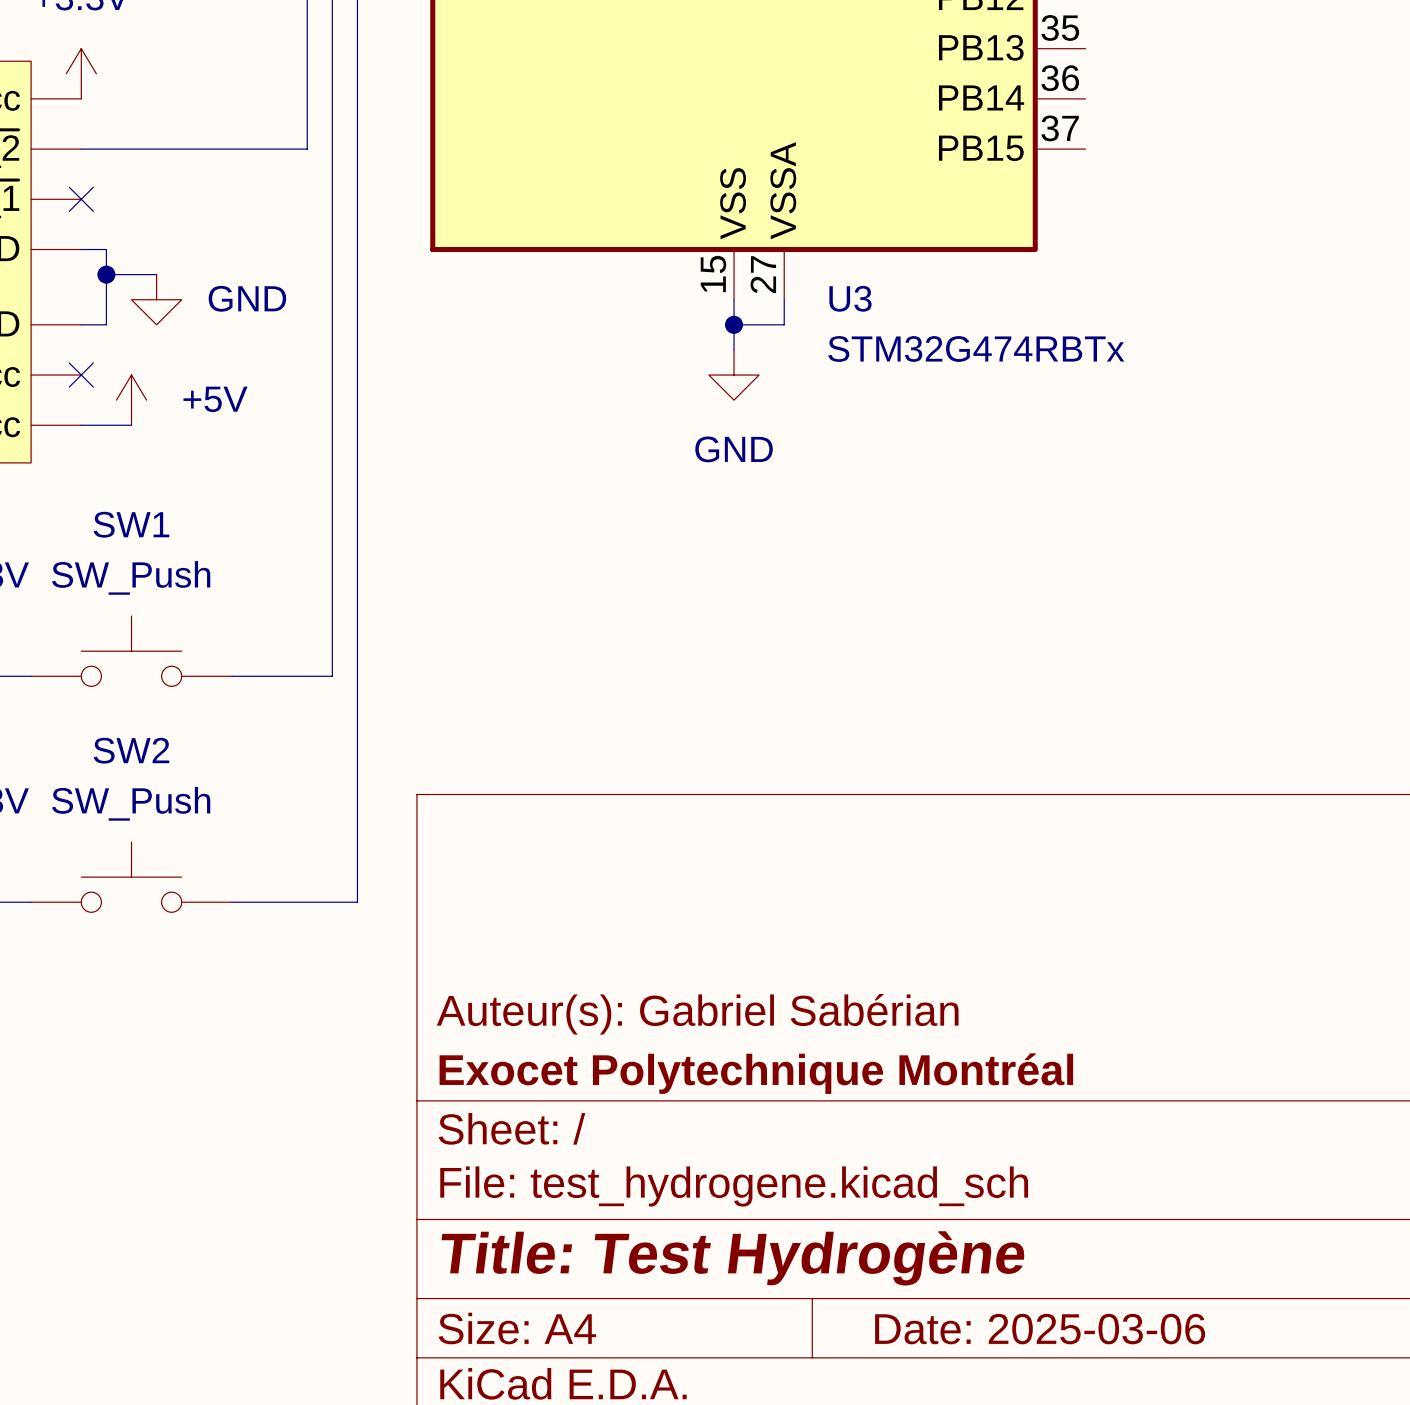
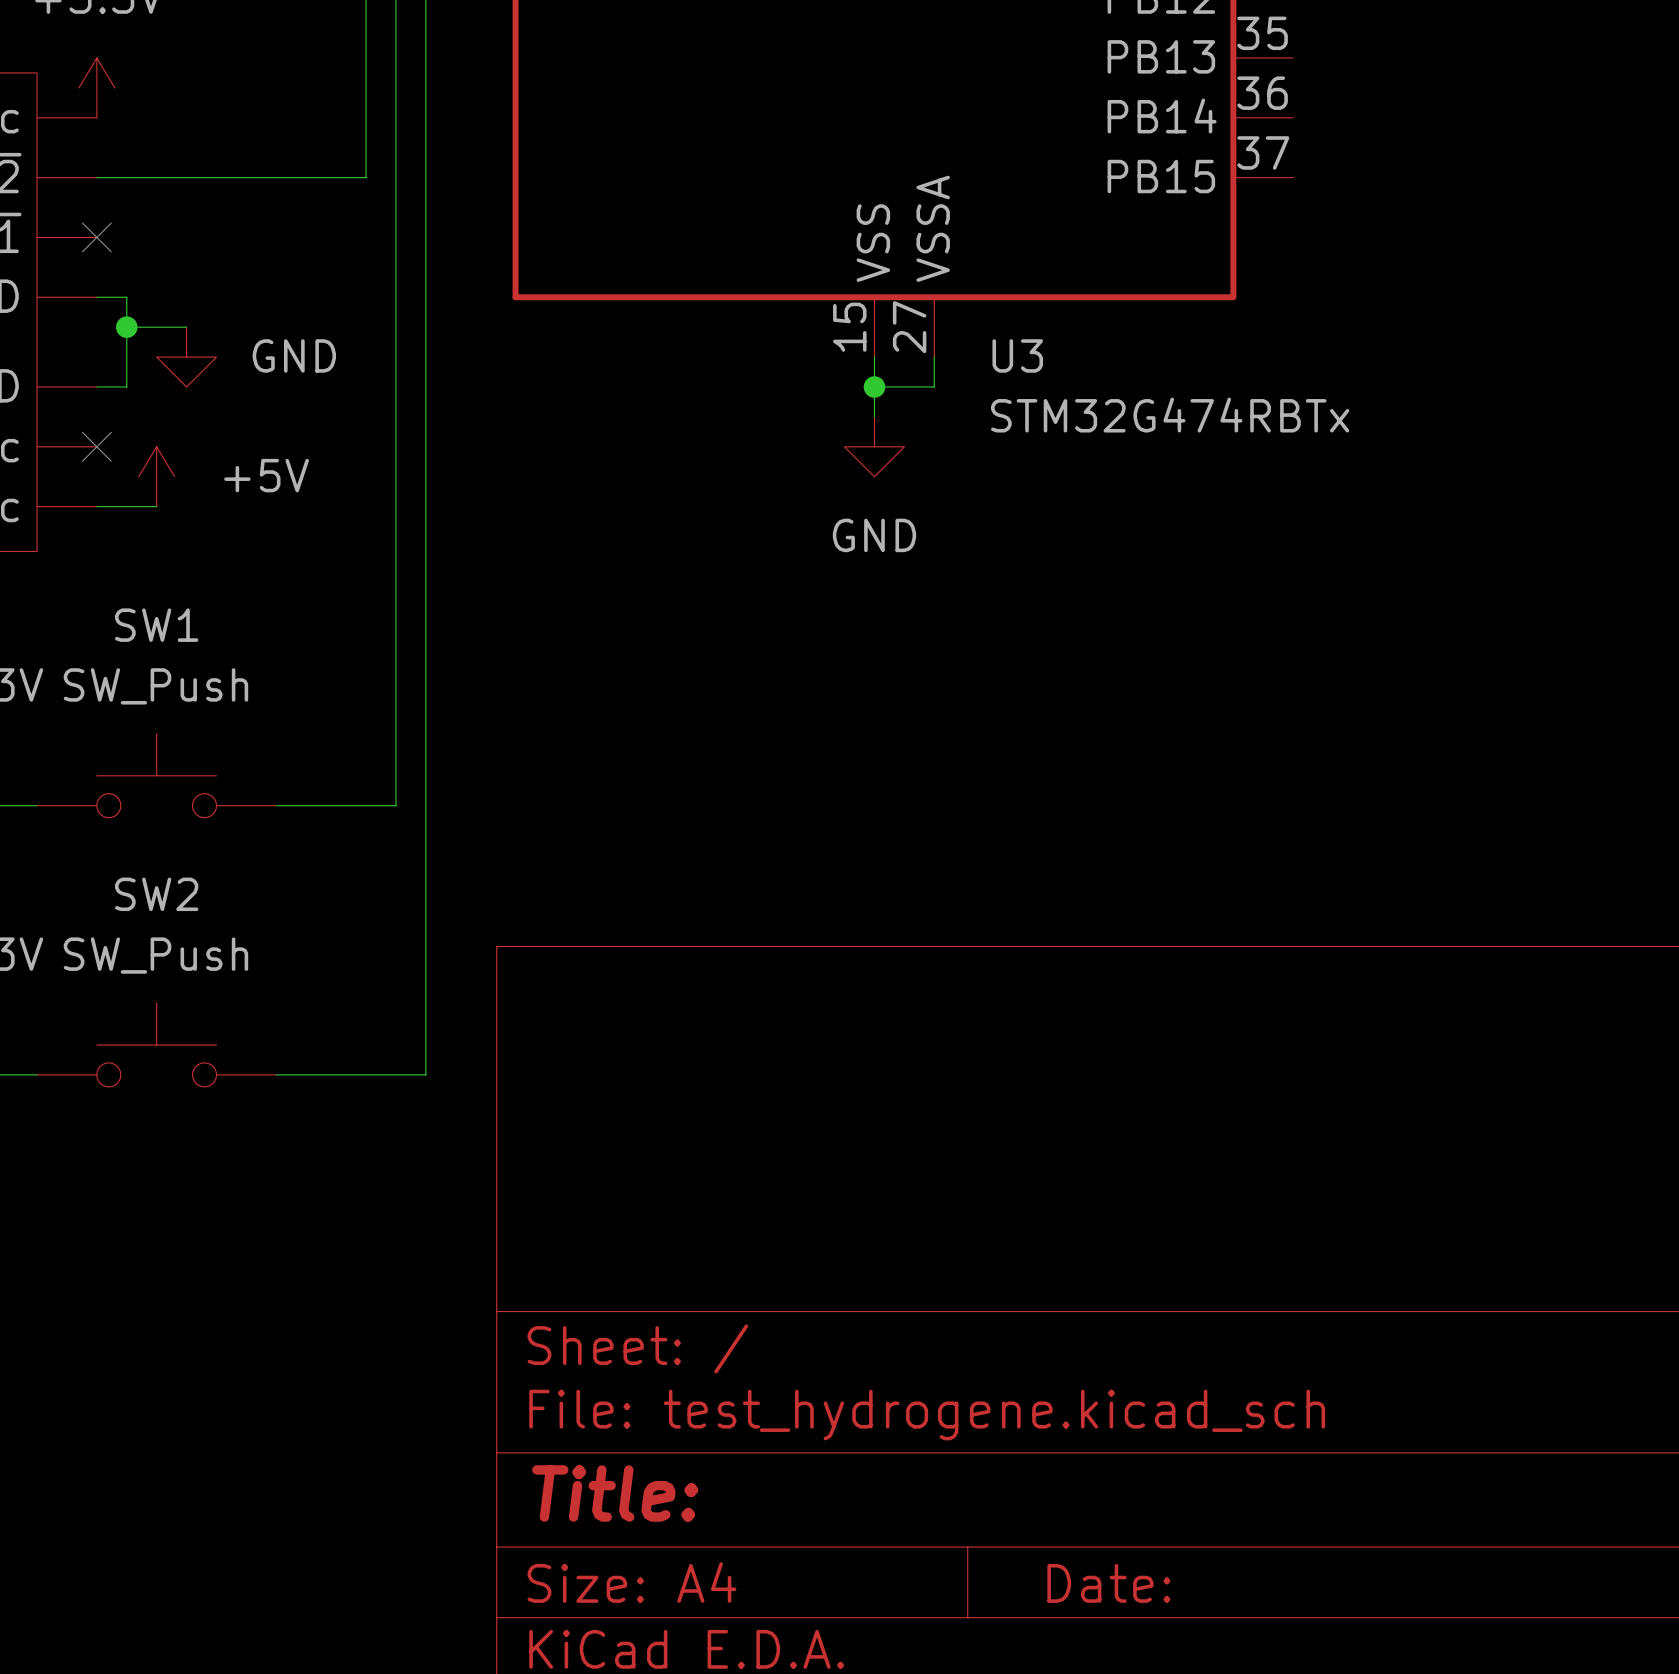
title block: Auteur(s): Gabriel Sabérian (697, 1014) -> none
title block: Exocet Polytechnique Montréal (756, 1073) -> none
title block: Title: Test Hydrogène (733, 1258) -> Title: (615, 1493)
title block: Date: 2025-03-06 (1040, 1329) -> Date: (1108, 1583)

